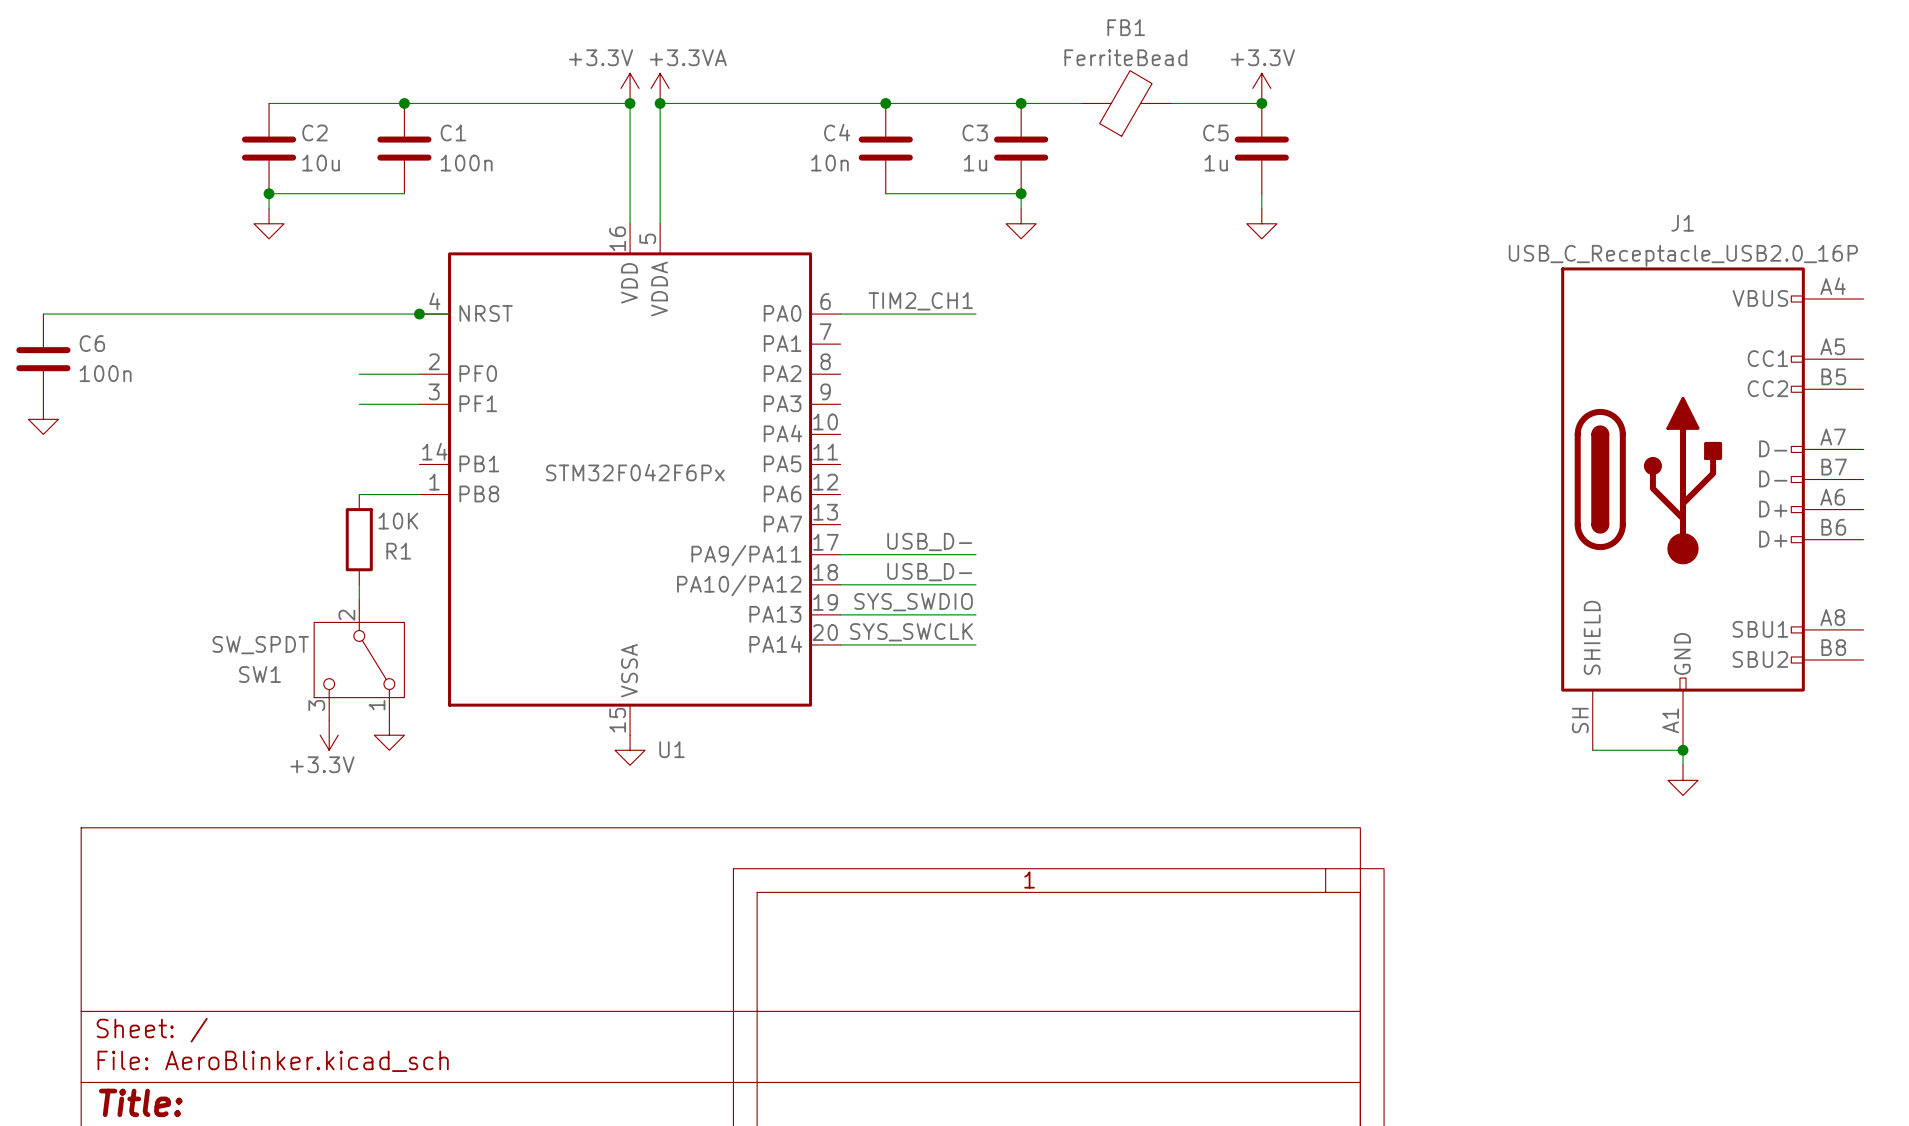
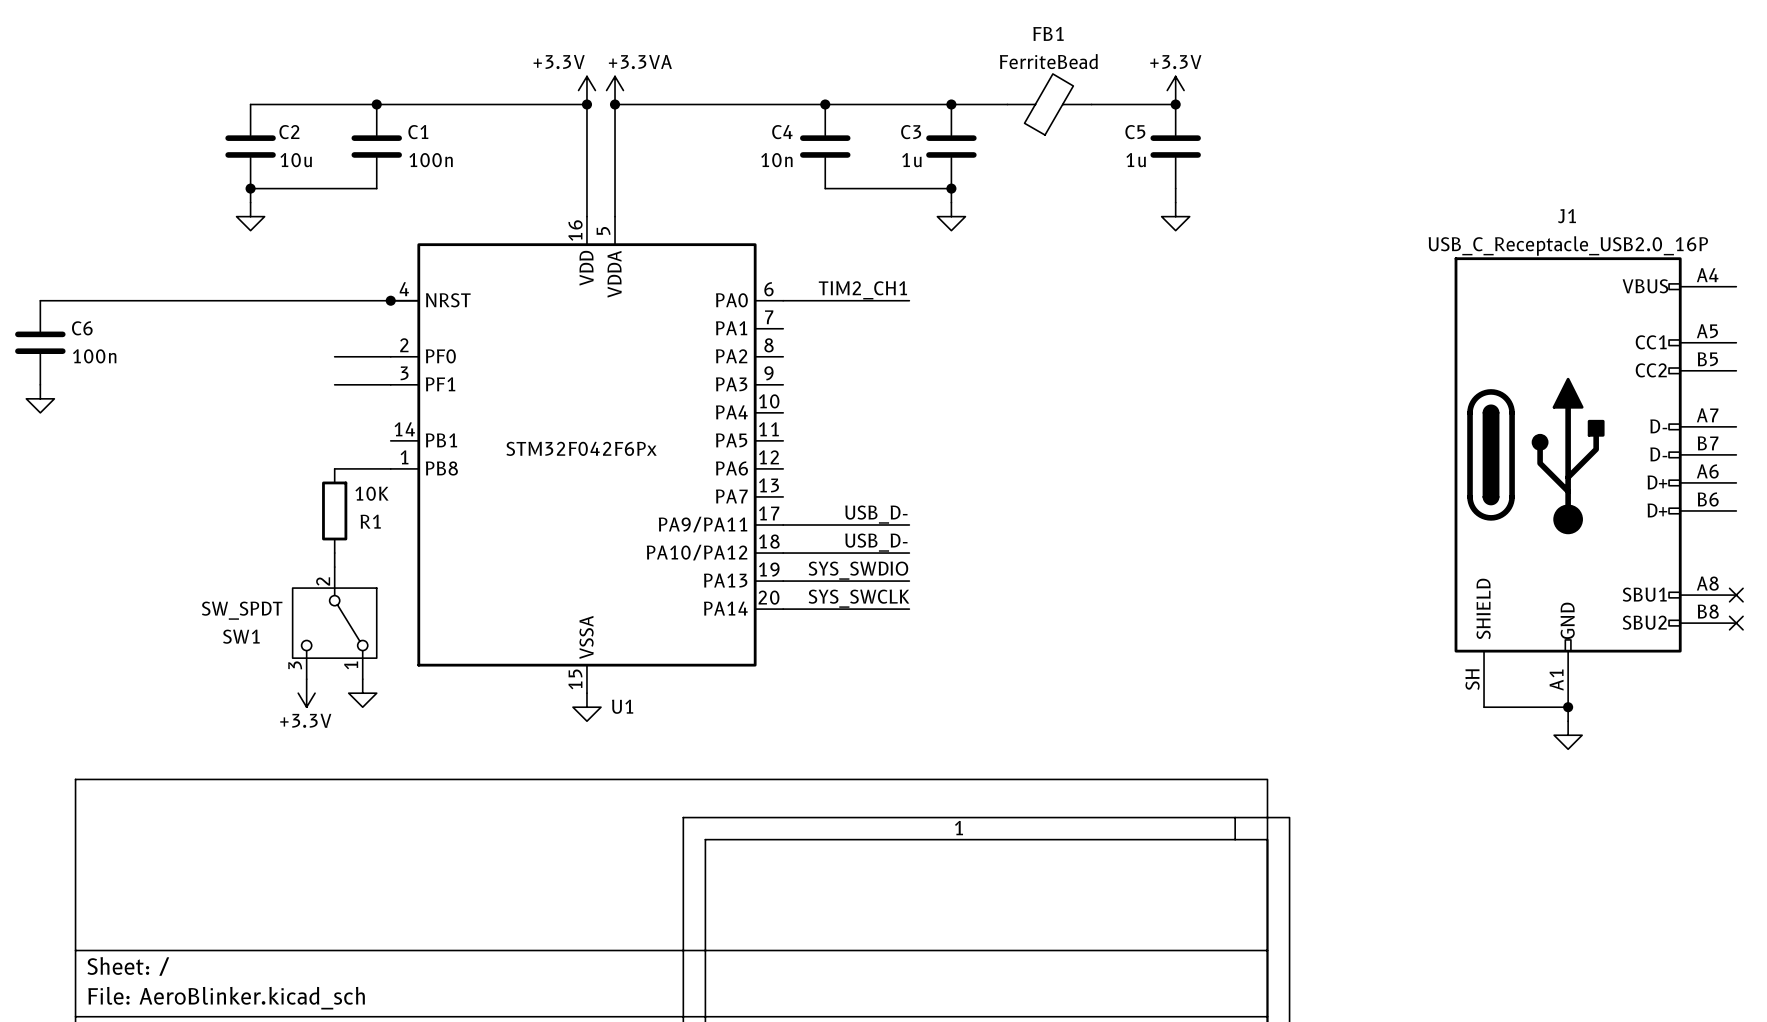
no-connect mark: none -> (1736, 595)
no-connect mark: none -> (1736, 623)

